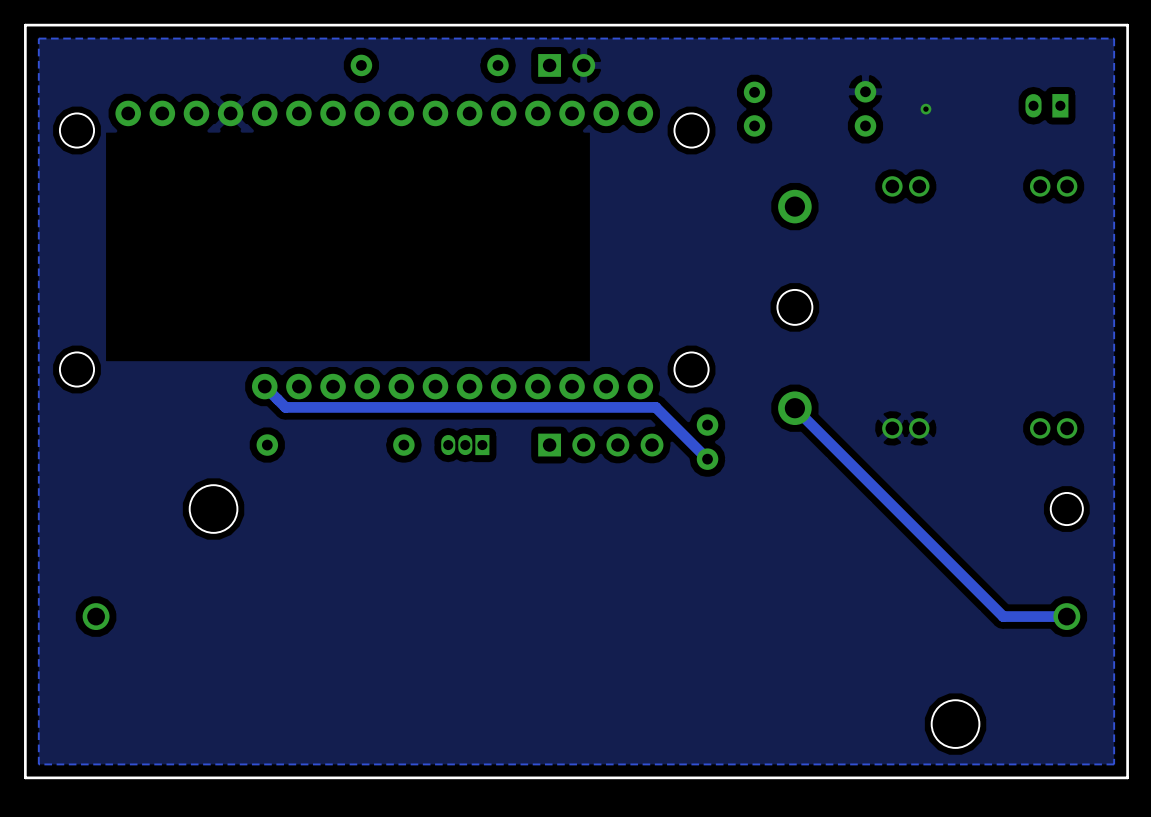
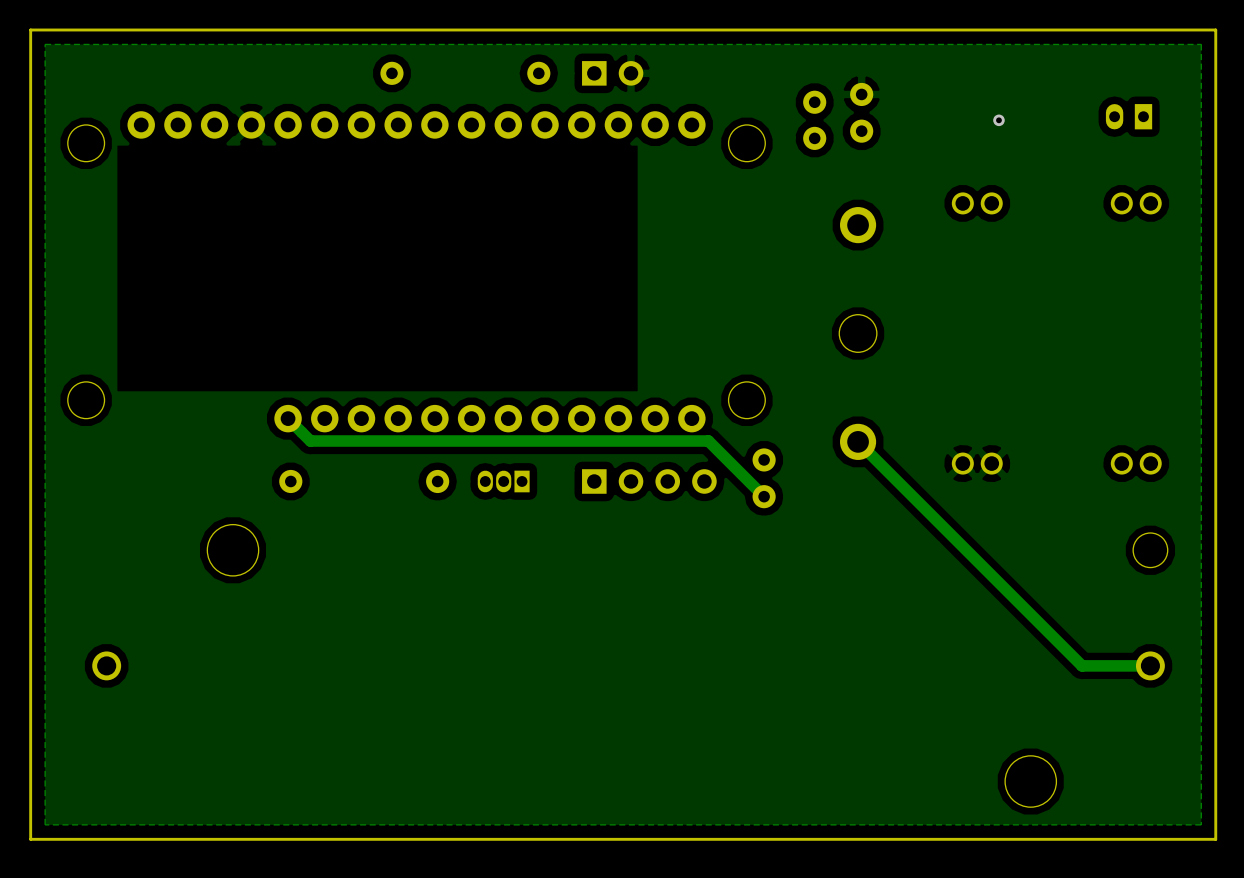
part position: (865, 108) -> (861, 112)

